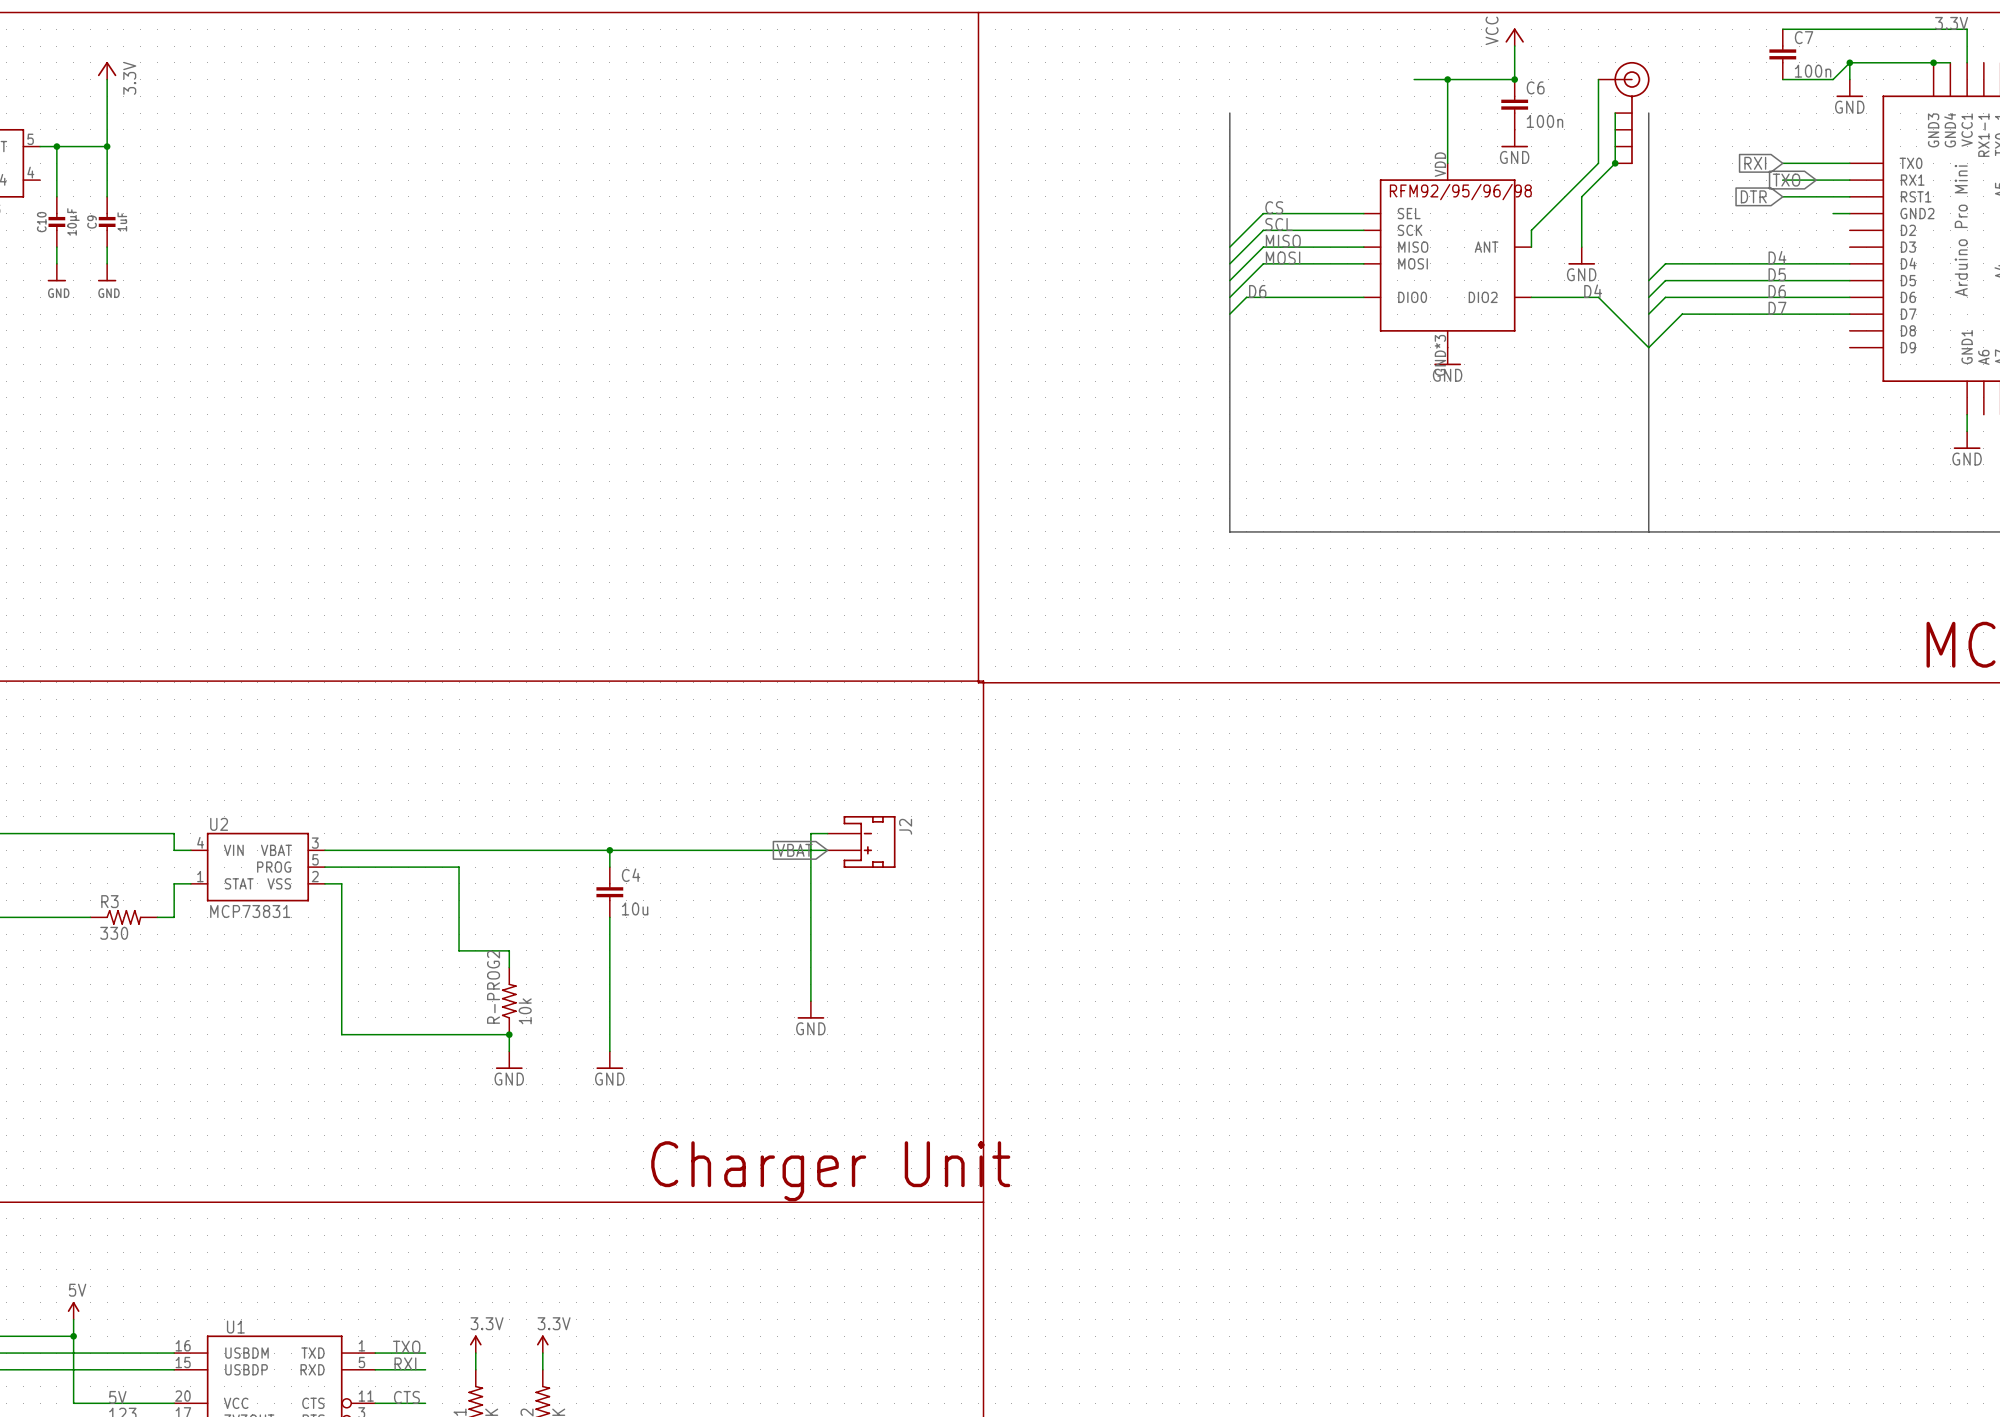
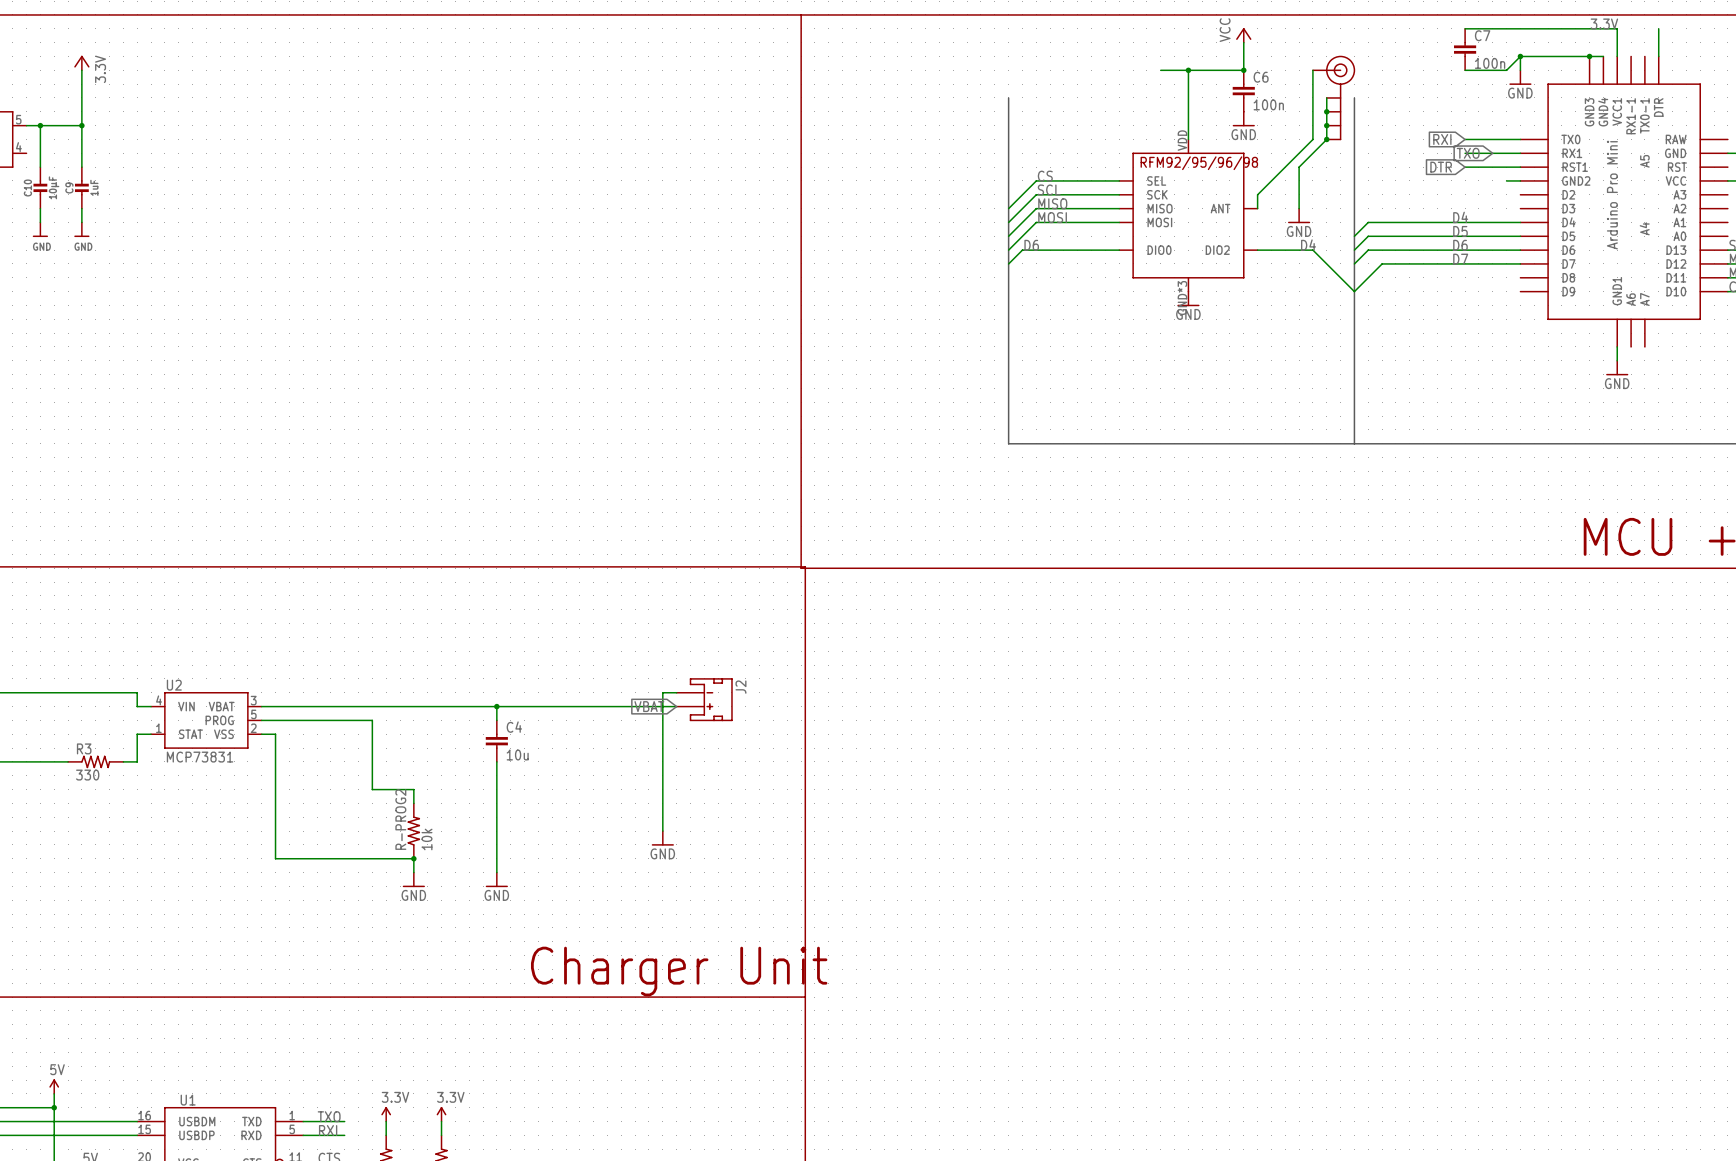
junction: none -> (1326, 111)
junction: none -> (1326, 125)

